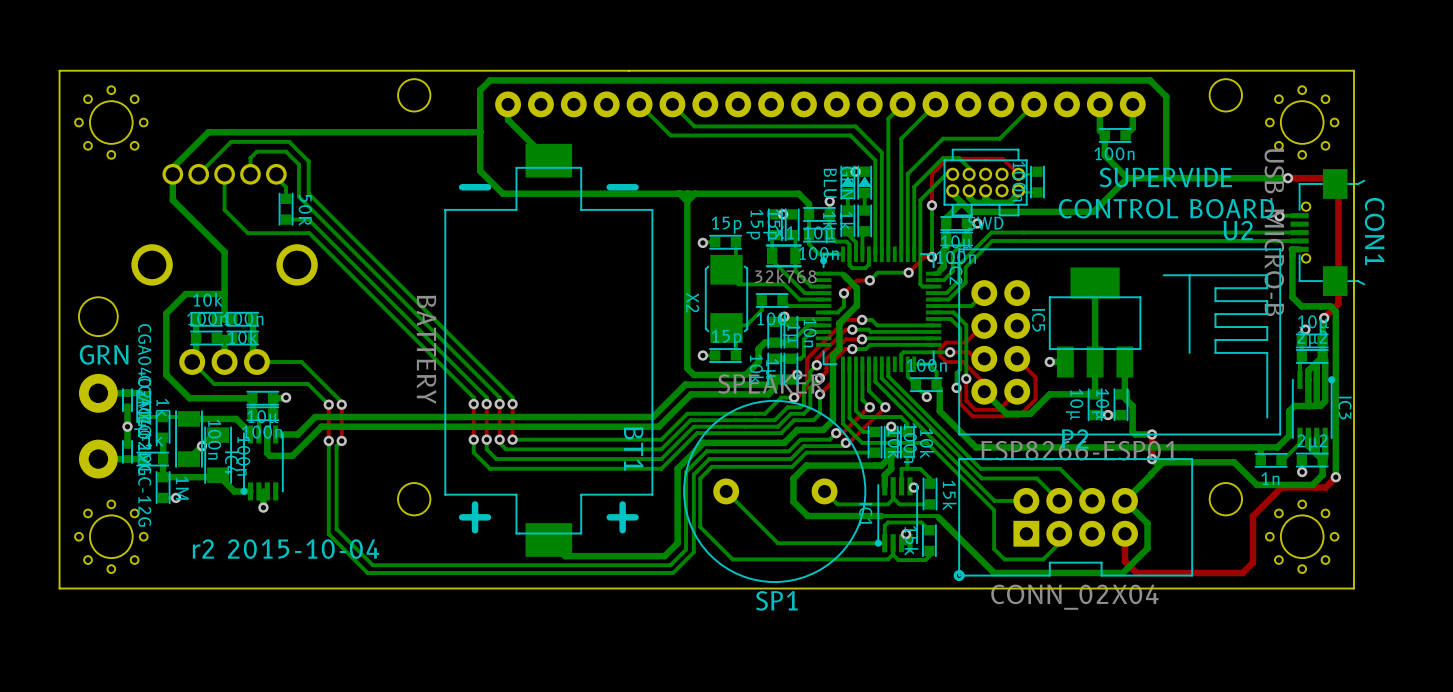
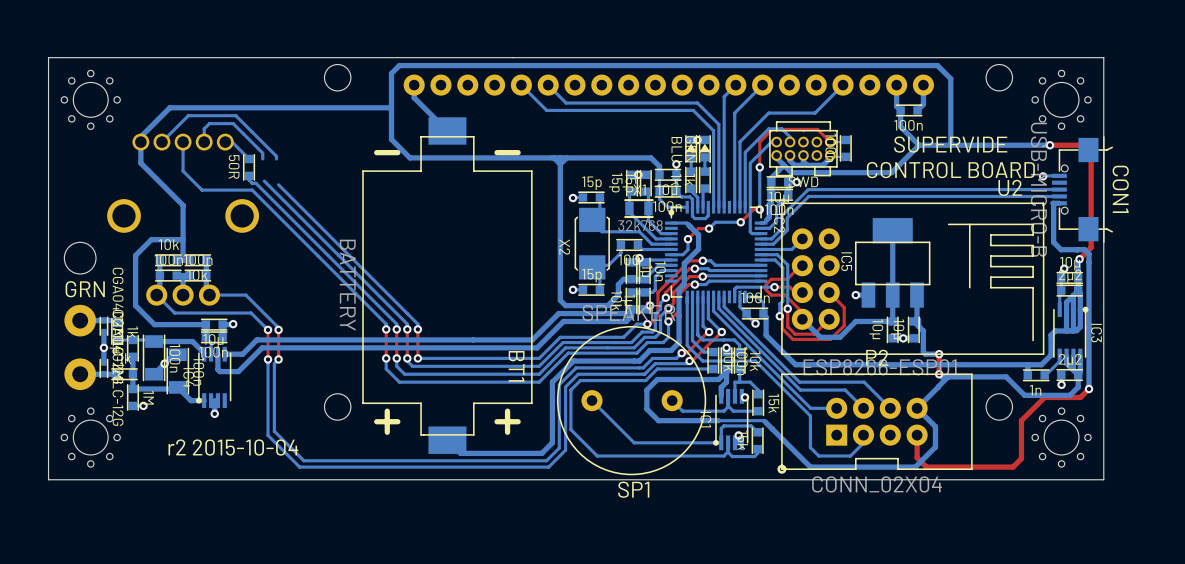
bottom track: (308, 161) (308, 193) (341, 226) -> (251, 131) (276, 156) (276, 158)
bottom track: (299, 164) (299, 196) (324, 222) -> (243, 134) (262, 153) (262, 158)
bottom track: none -> (225, 142) (232, 142) (249, 158)
bottom track: (276, 177) (286, 187) (286, 198) -> none
part position: (286, 209) -> (249, 167)
part value position: 50R (305, 210) -> 50R (234, 167)
bottom track: (286, 219) (308, 219) (313, 224) -> (249, 175) (249, 180) (252, 183) (255, 183)

